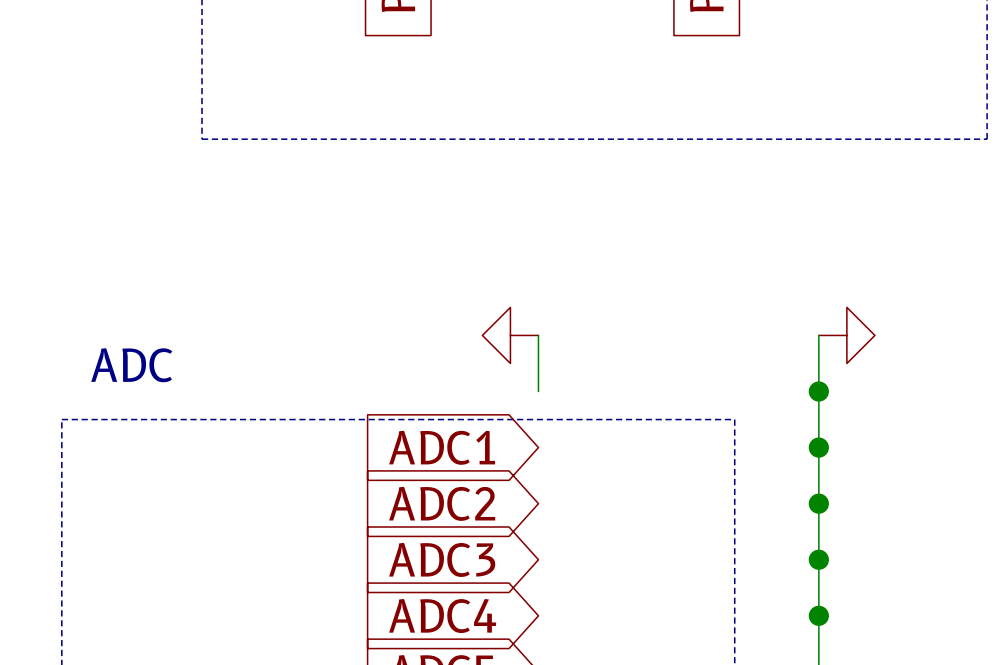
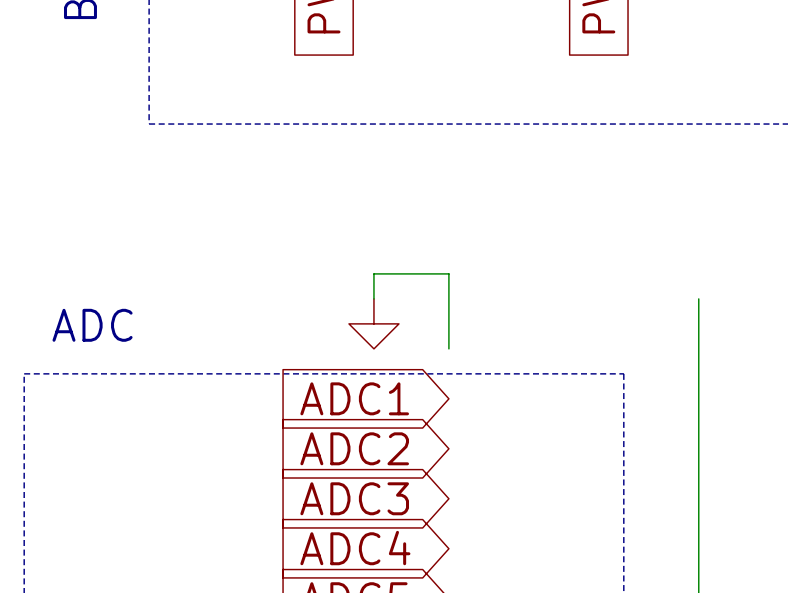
wire: none -> (373, 298) (373, 273) (448, 273) (448, 298)
power symbol rotation: 0° (510, 335) -> 90° counterclockwise (373, 323)
power symbol position: (510, 335) -> (373, 323)
power symbol: (846, 335) -> none
junction: (818, 391) -> none
junction: (818, 447) -> none
junction: (818, 503) -> none
junction: (818, 559) -> none
junction: (818, 615) -> none

